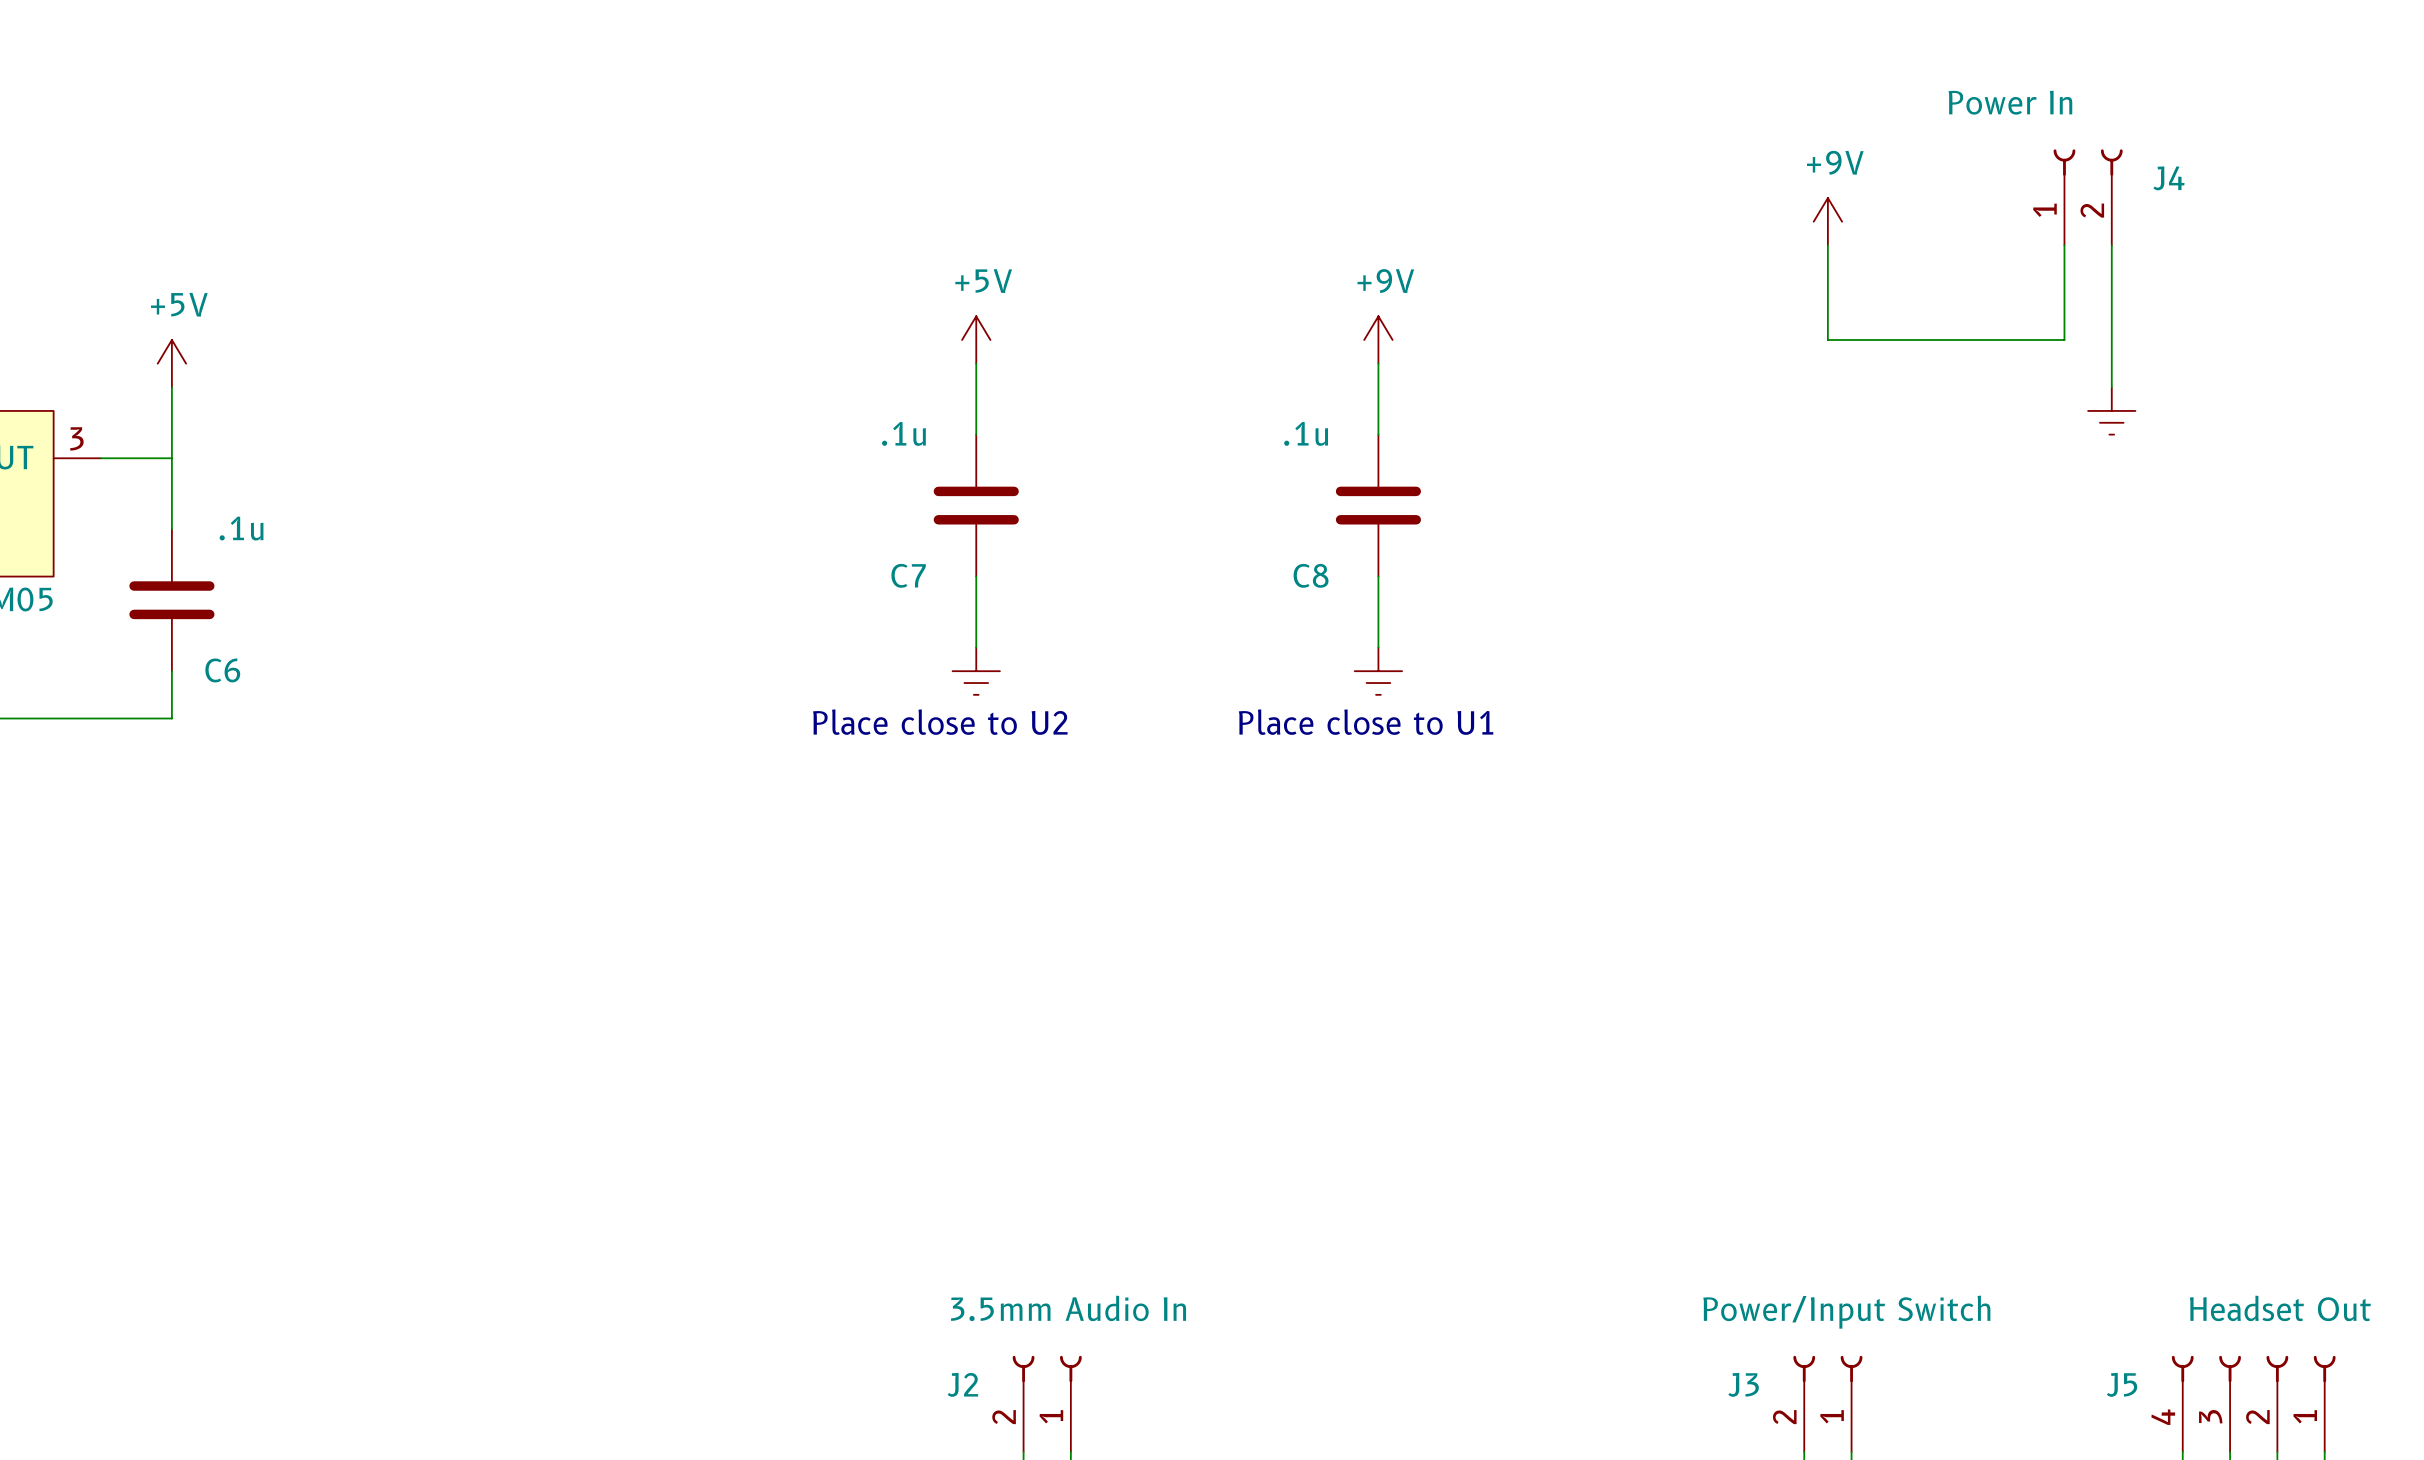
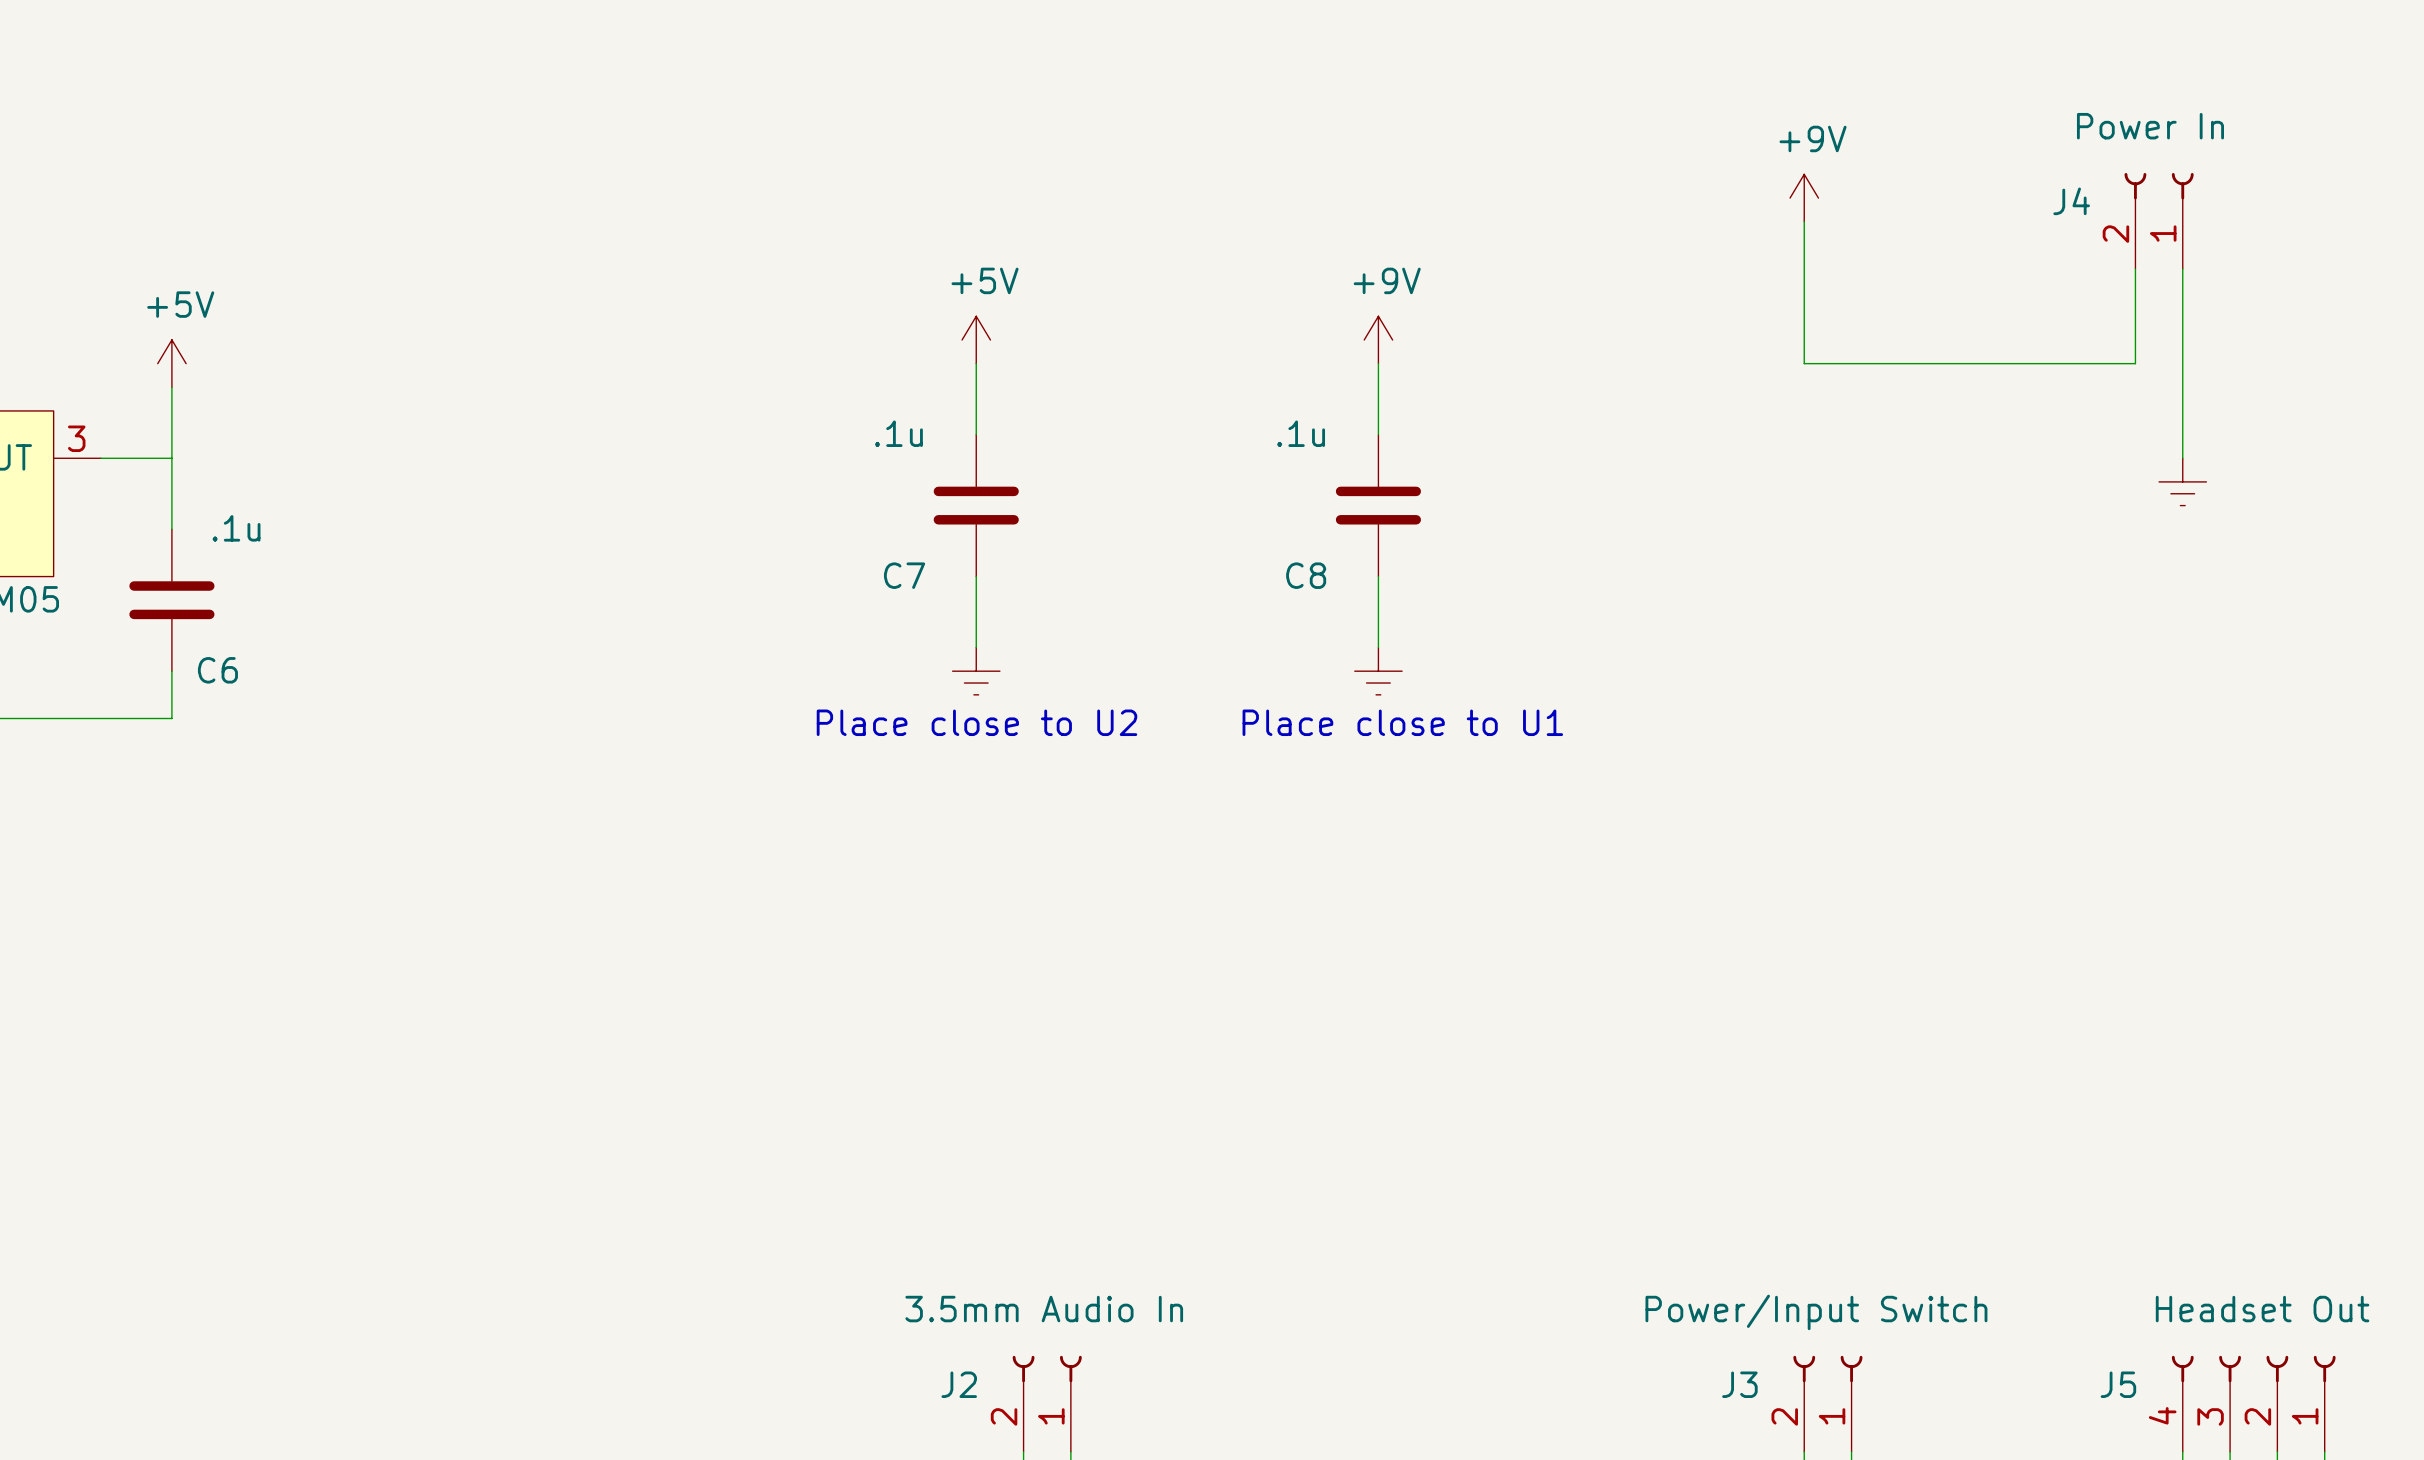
J4 flip: as is (2088, 162) -> left-right (2159, 186)
J4 position: (2088, 197) -> (2159, 221)
wire: none -> (1804, 221) (1804, 363) (2135, 363) (2135, 269)
power symbol position: +9V (1827, 221) -> +9V (1804, 198)
wire: (1827, 245) (1827, 339) (2064, 339) (2064, 245) -> none
wire: (2111, 245) (2111, 387) -> none
wire: none -> (2182, 269) (2182, 458)
power symbol position: (2111, 410) -> (2182, 481)

